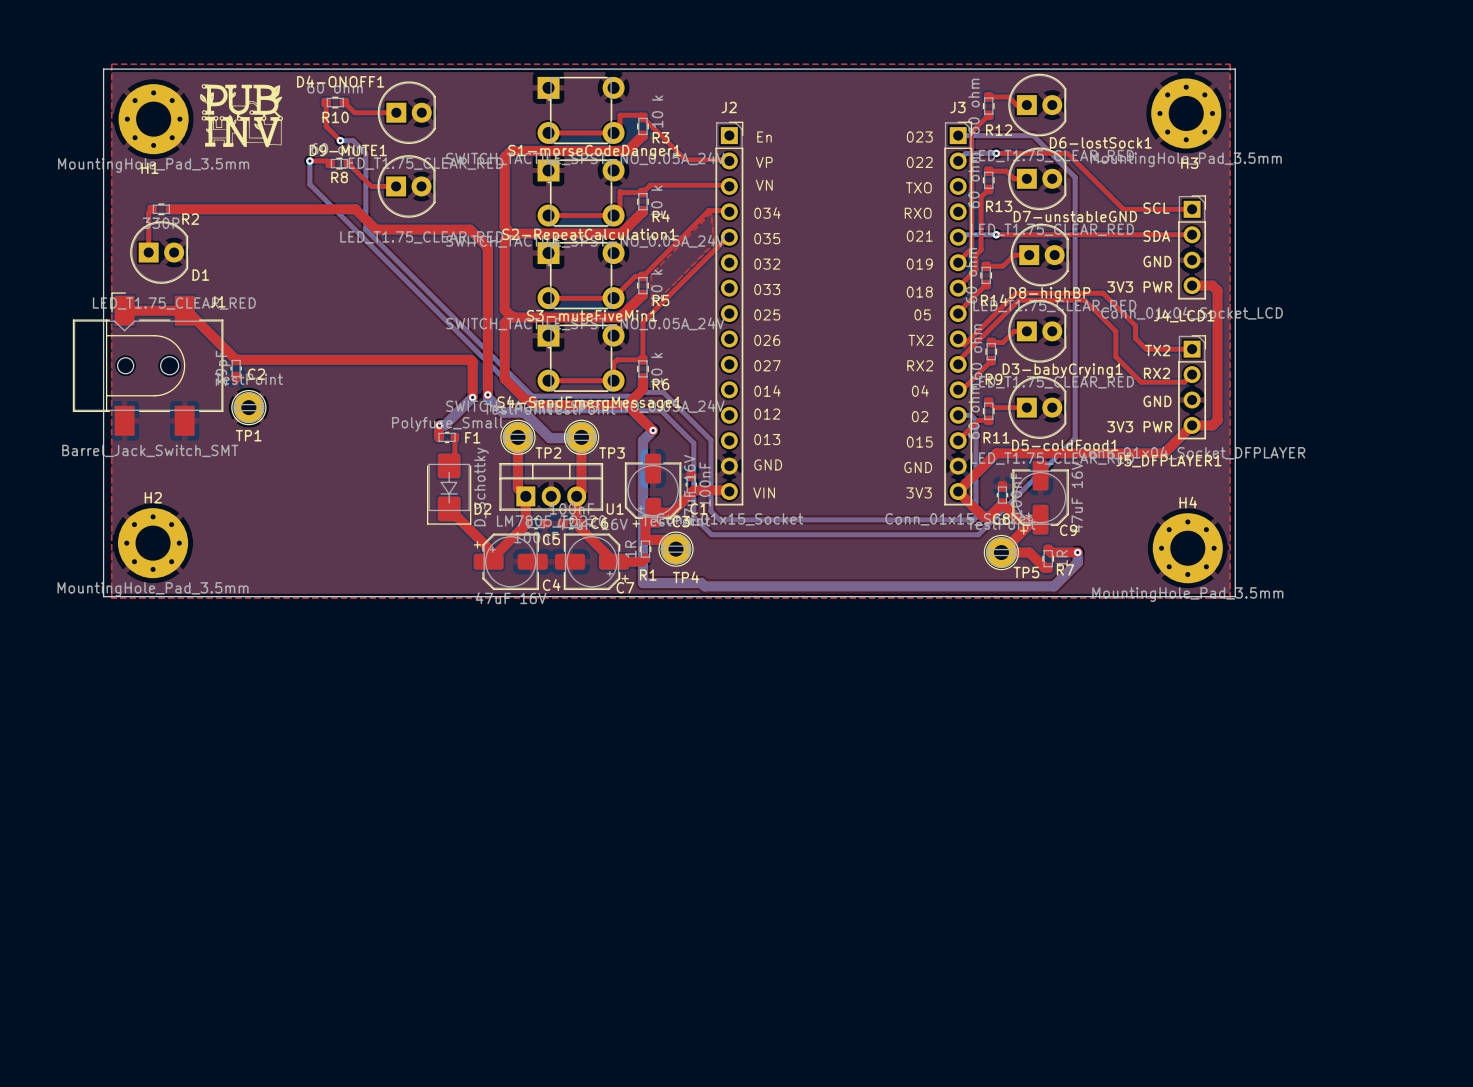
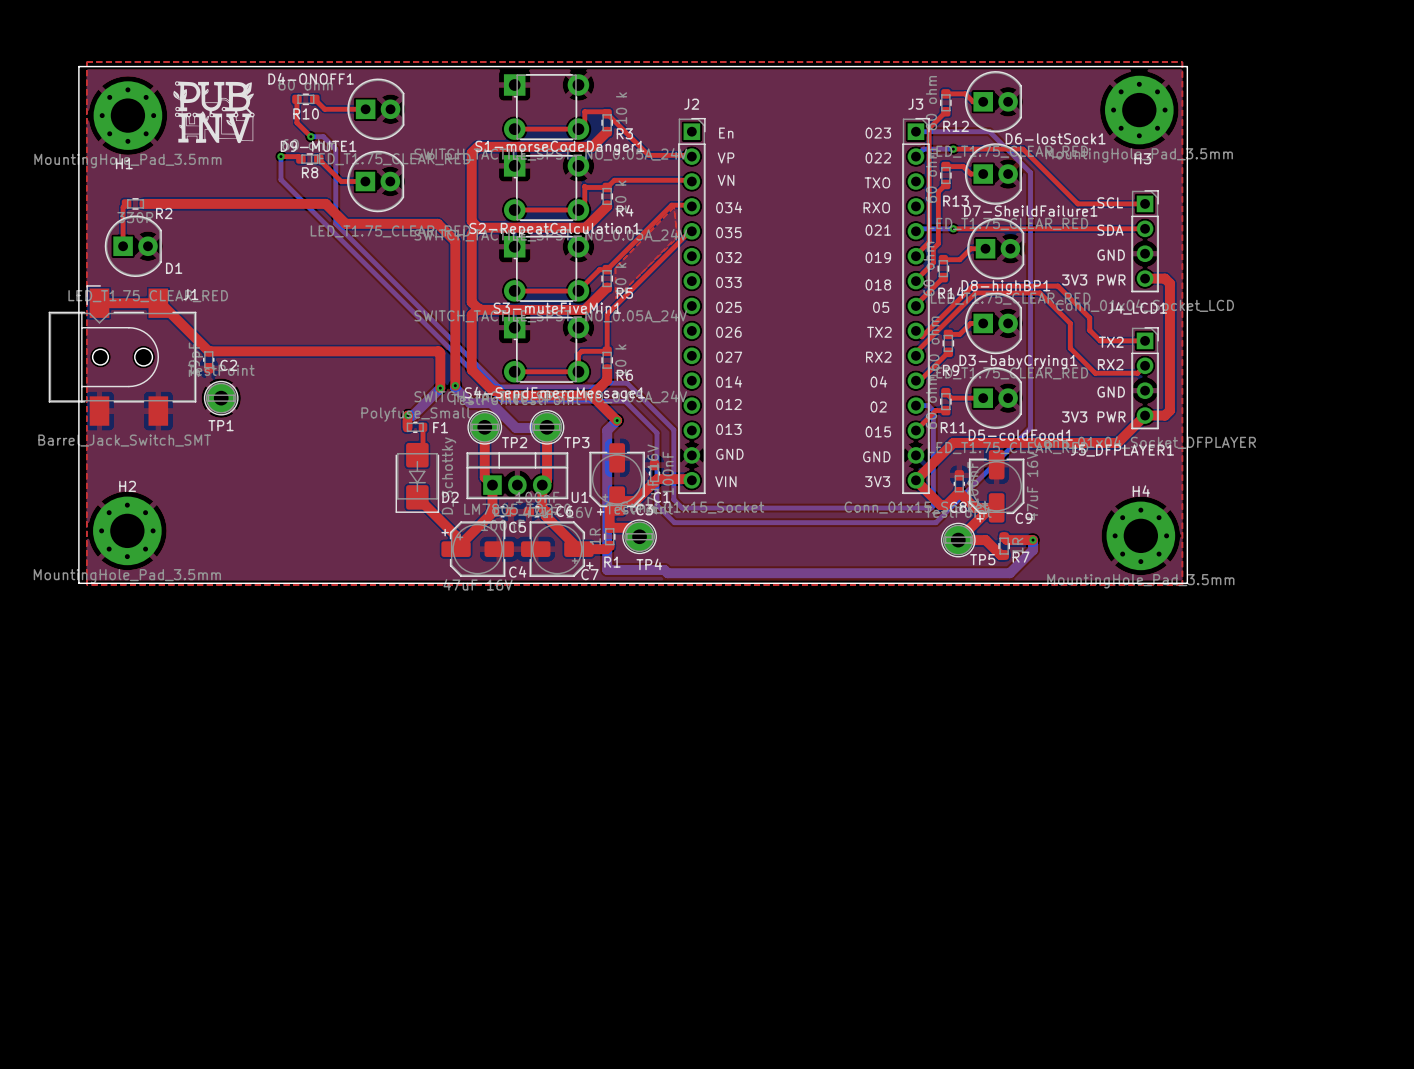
D7-unstableGND name: D7-unstableGND (1075, 216) -> D7-SheildFailure1 (1030, 211)
D8-highBP name: D8-highBP (1049, 294) -> D8-highBP1 (1005, 287)

